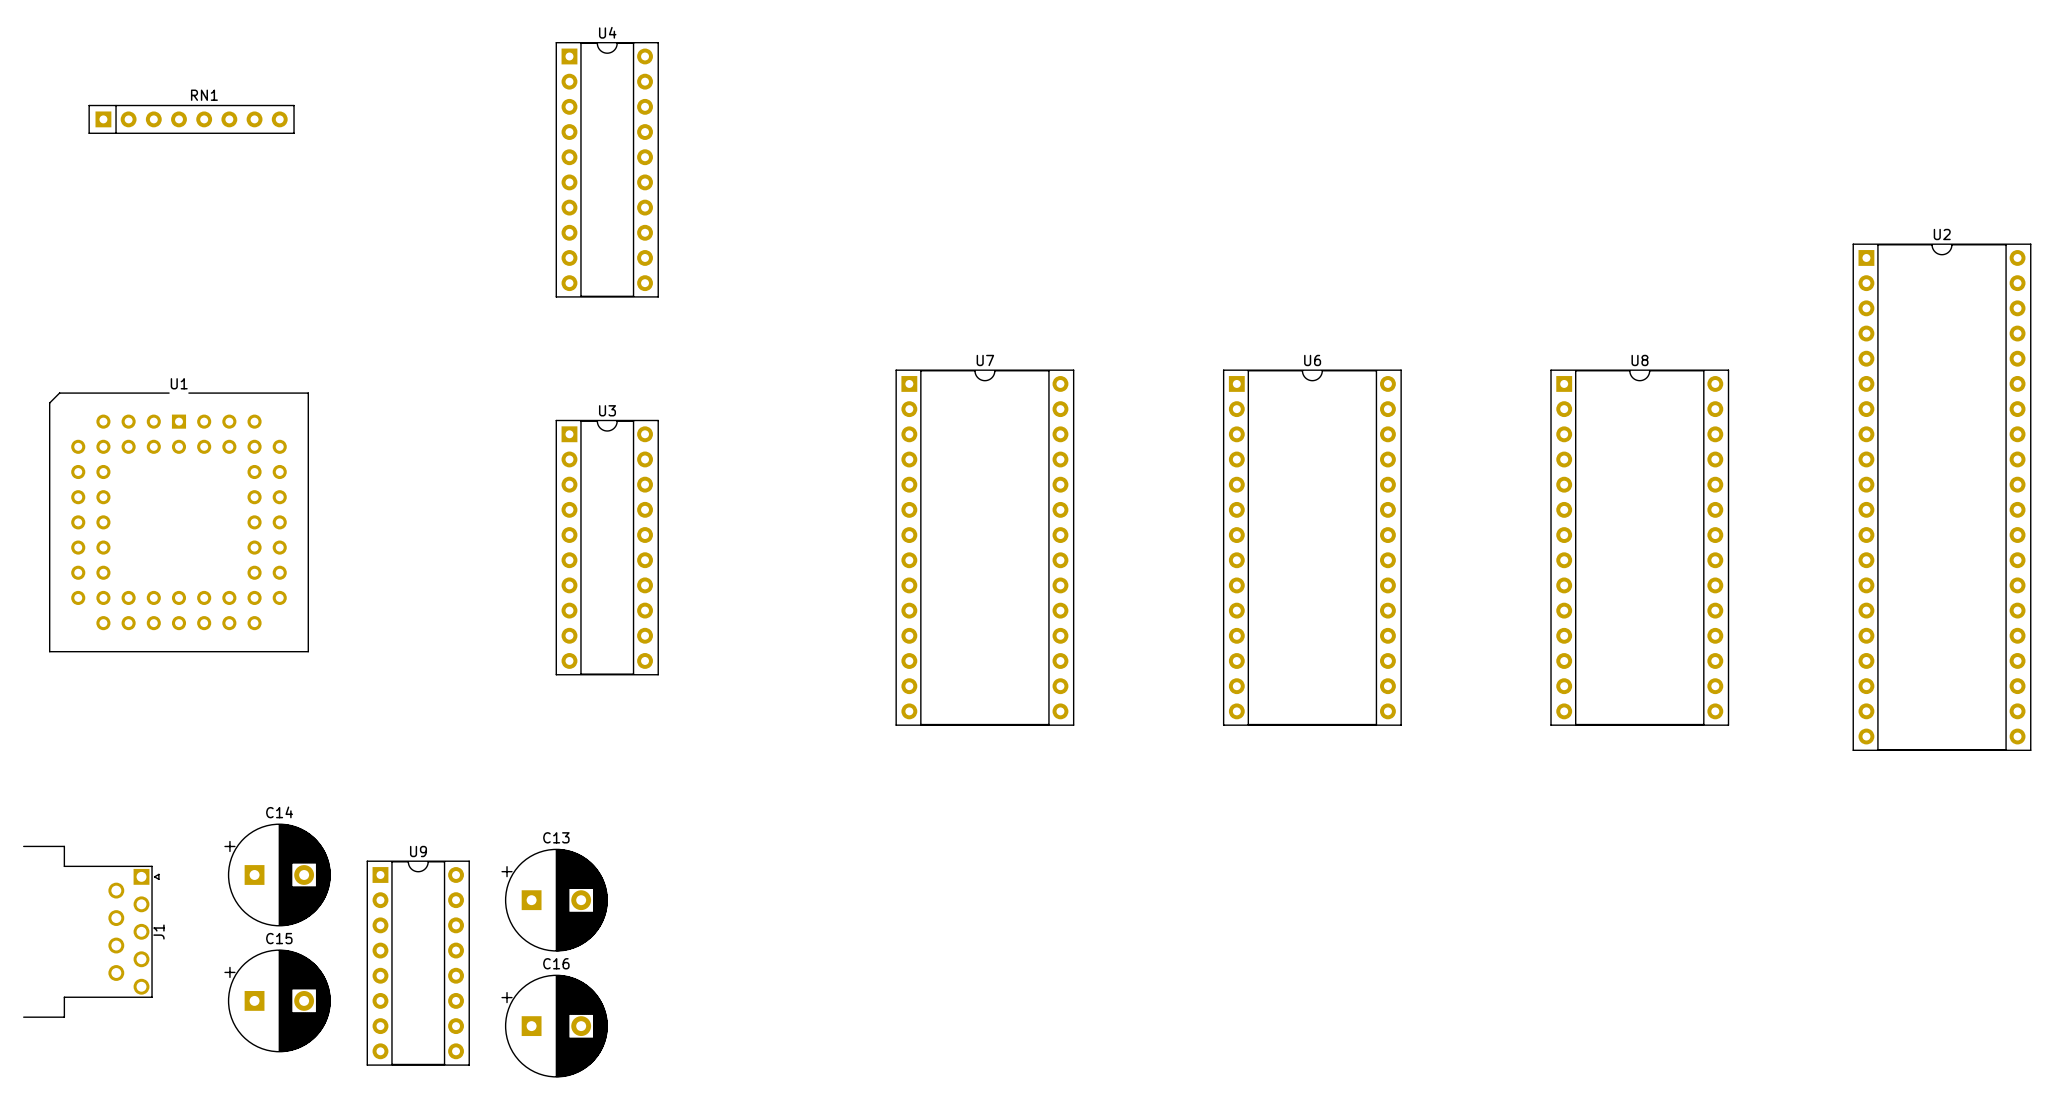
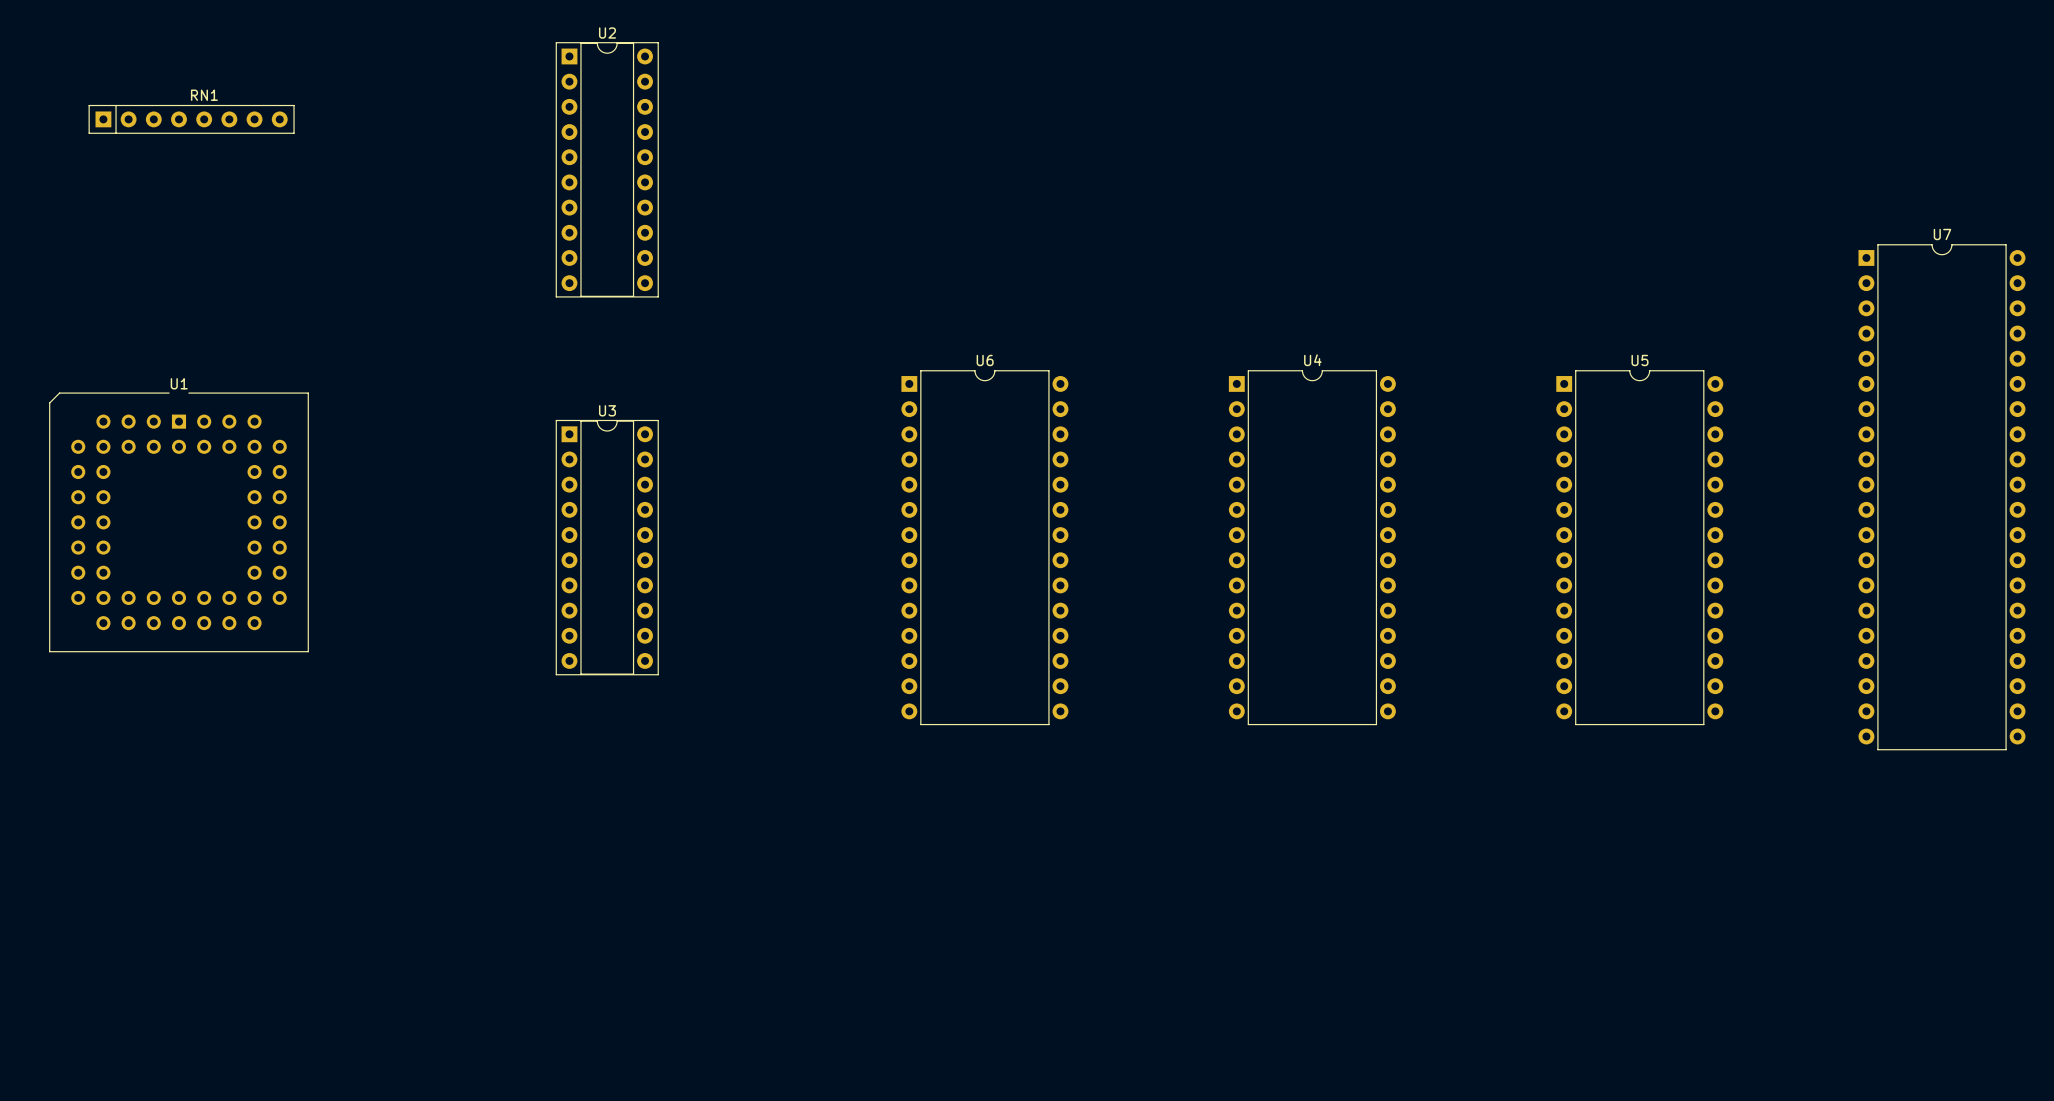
U4 name: U4 (607, 32) -> U2 (607, 33)
U7 name position: U7 (985, 360) -> U7 (1942, 234)
U7 footprint: [895, 369, 1075, 726] -> [1858, 244, 2026, 751]
U6 footprint: [1223, 369, 1402, 726] -> [901, 370, 1069, 726]
U2: (1941, 497) -> none
U4: none -> (1312, 547)
U8: (1639, 547) -> none
U5: none -> (1639, 547)
C14: (277, 874) -> none
C13: (554, 900) -> none
J1: (91, 931) -> none
U9: (418, 963) -> none
C15: (277, 1000) -> none
C16: (554, 1026) -> none

